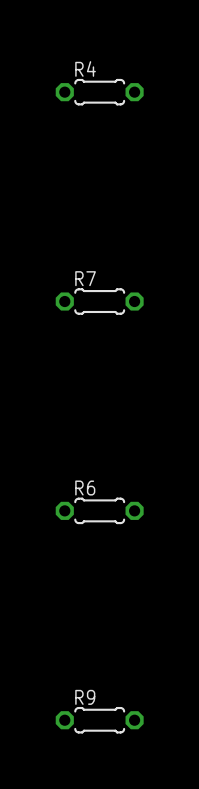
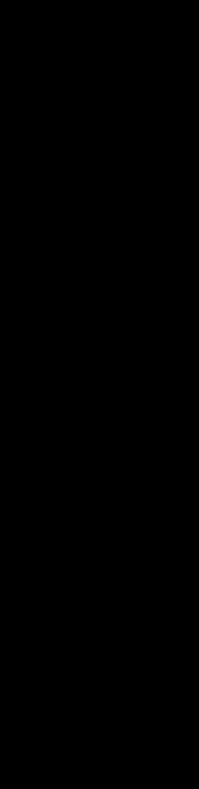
R4: (99, 92) -> none
R7: (99, 301) -> none
R6: (99, 510) -> none
R9: (99, 720) -> none

